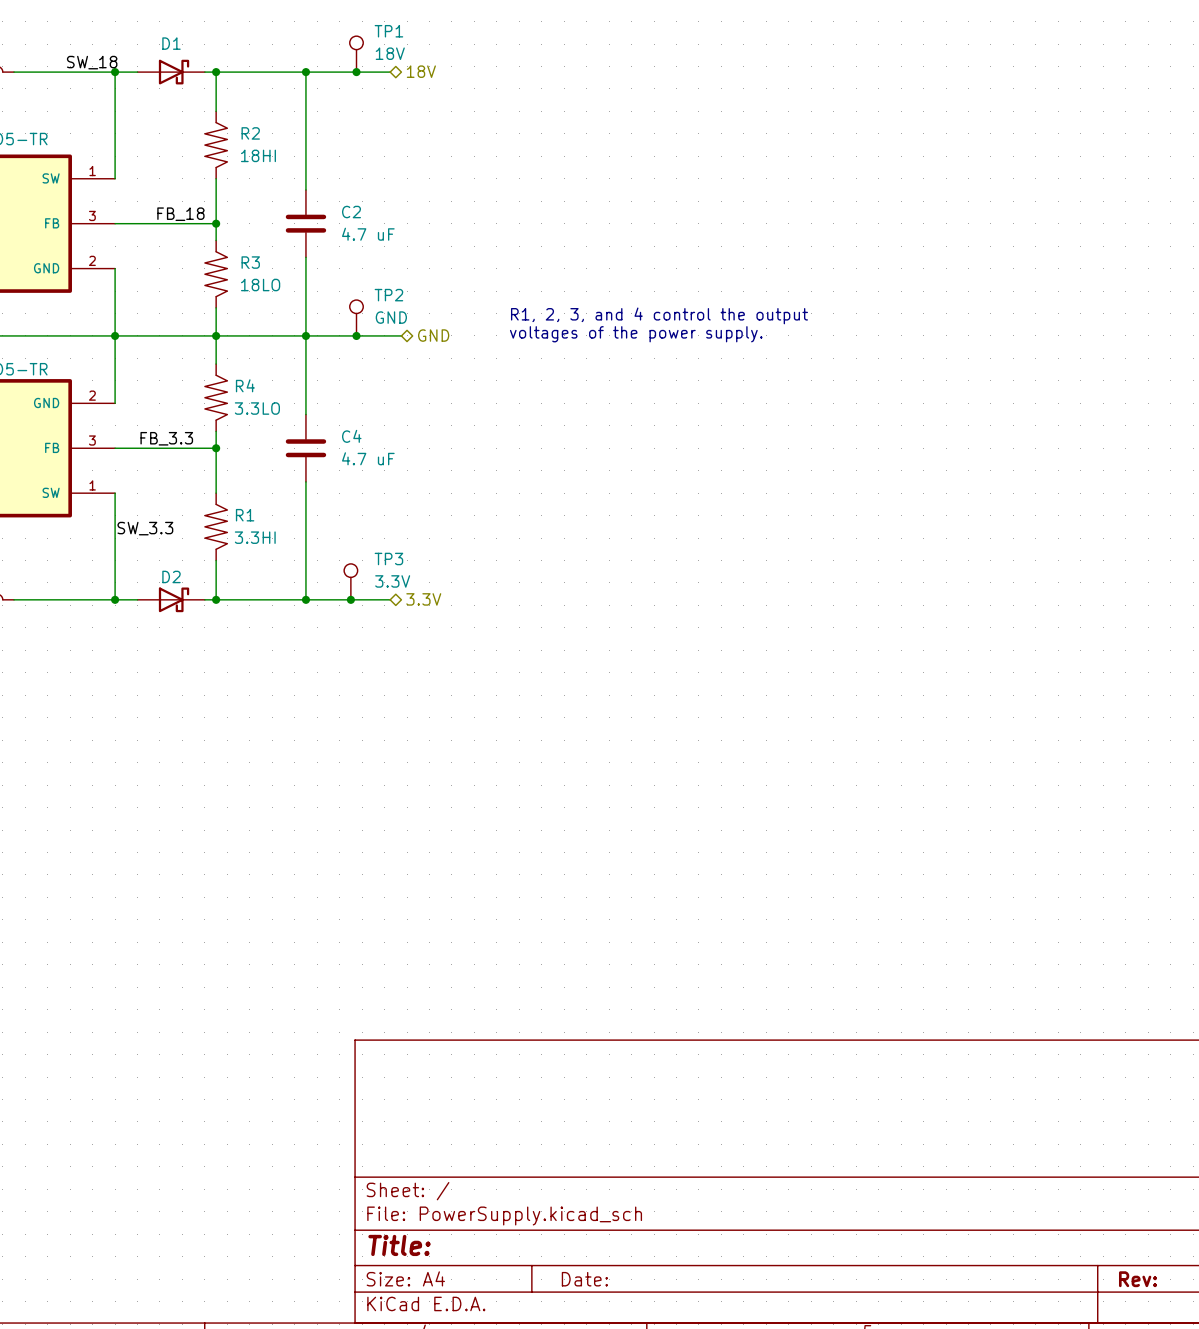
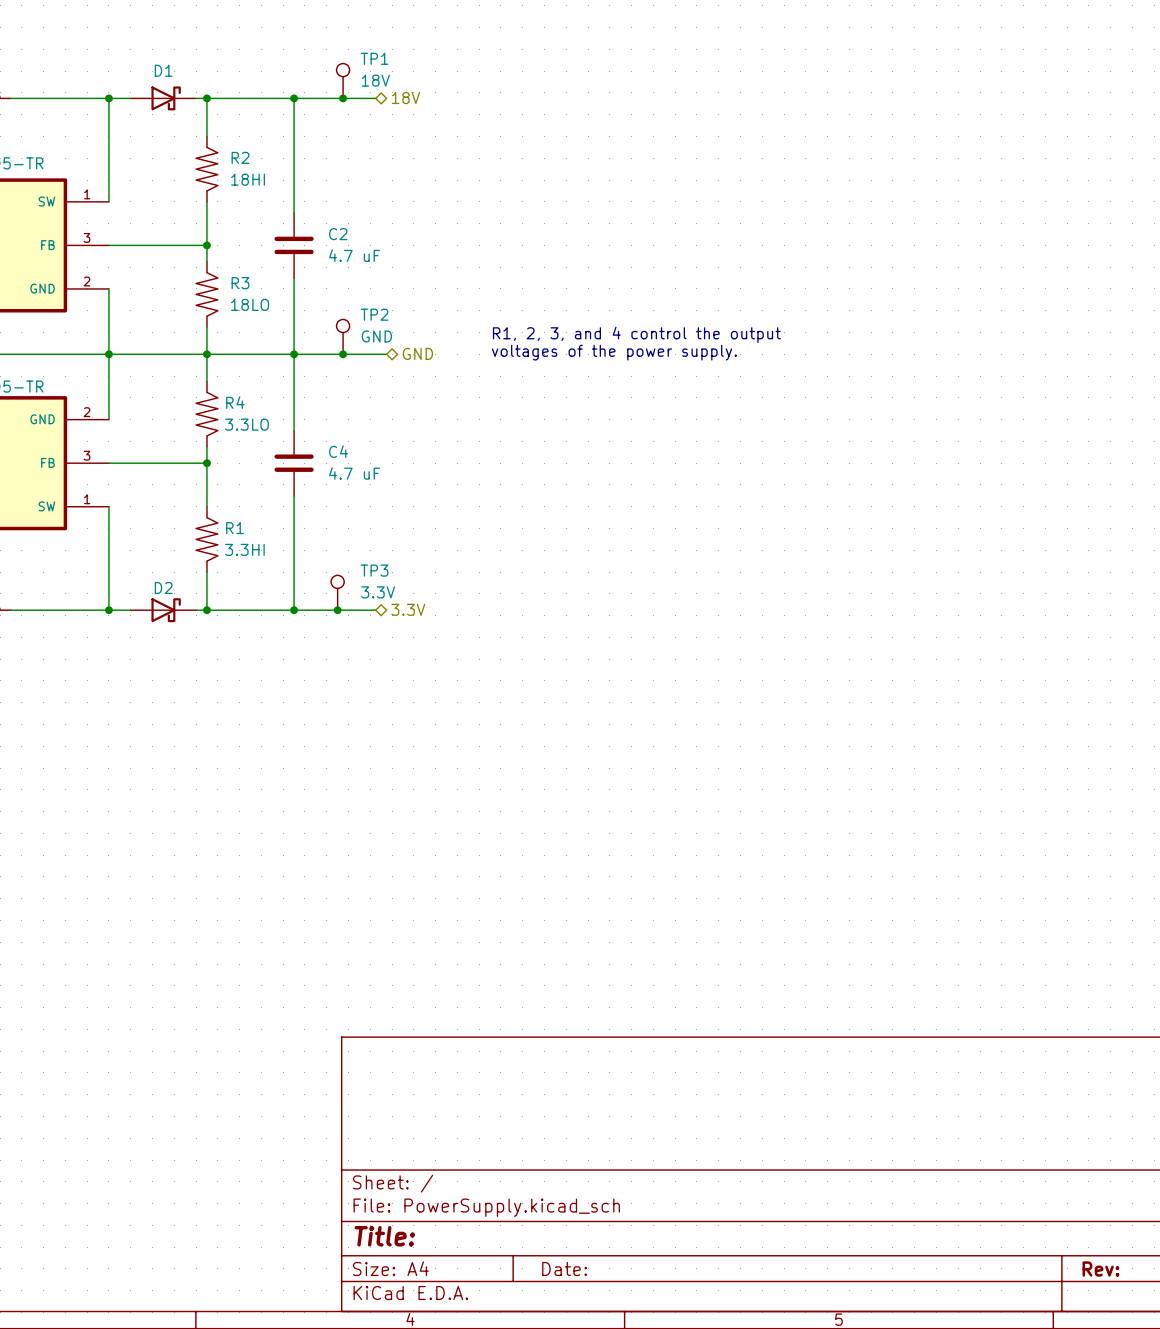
label: SW_18 (92, 62) -> none
label: FB_18 (180, 214) -> none
label: FB_3.3 (166, 438) -> none
label: SW_3.3 (145, 528) -> none

